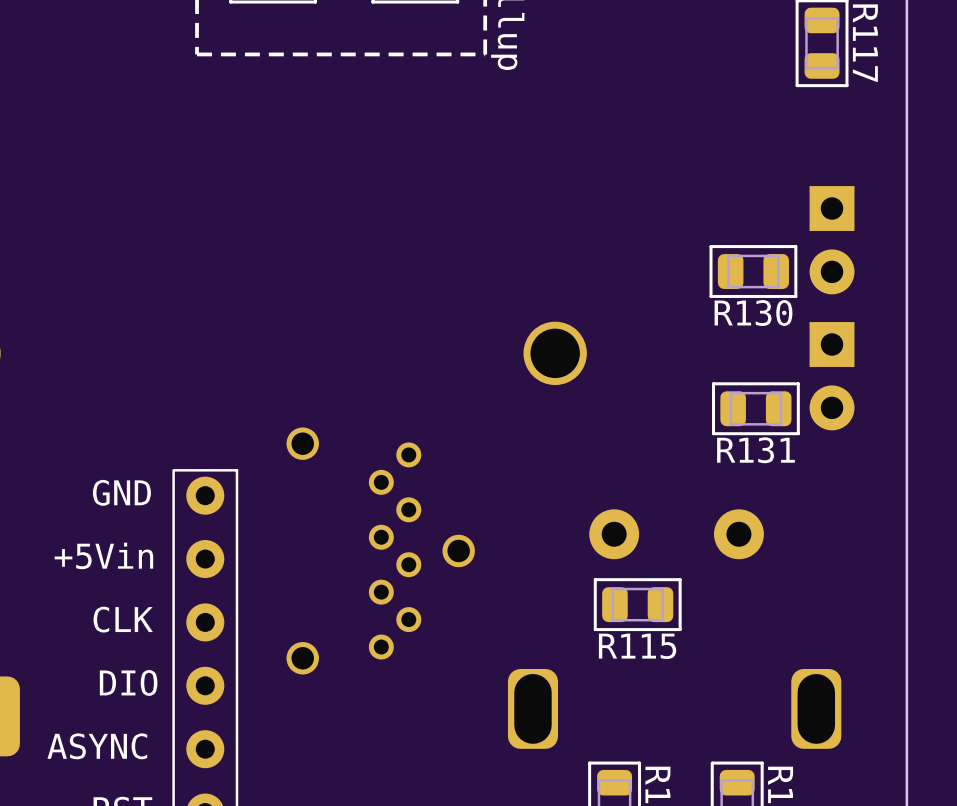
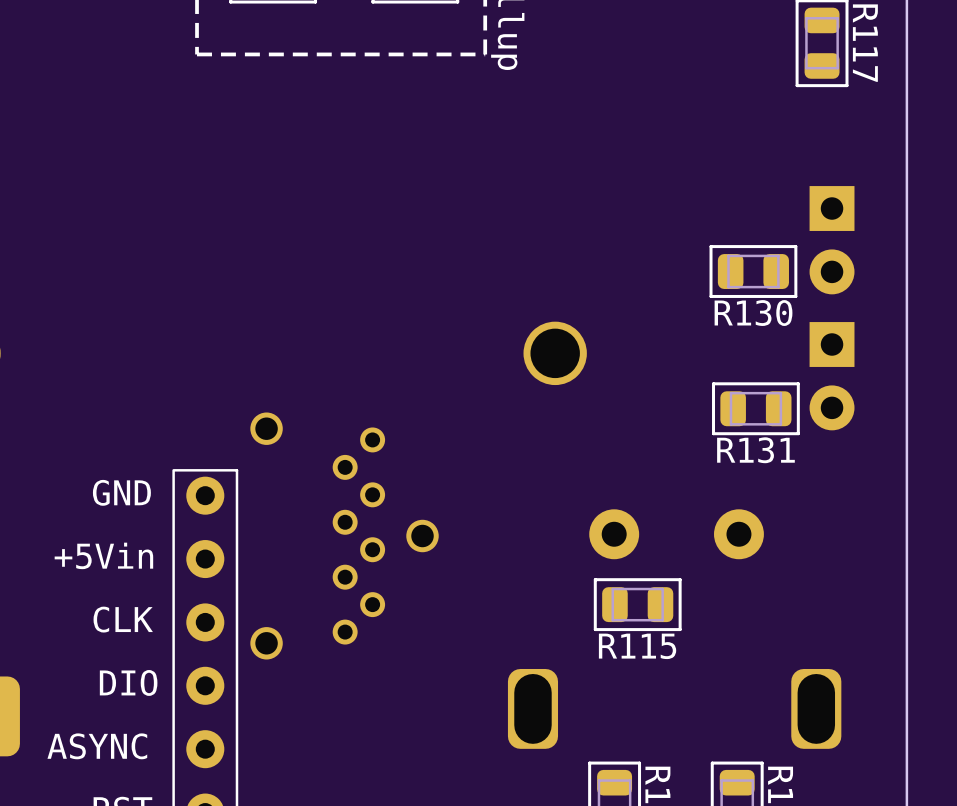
part position: (380, 550) -> (344, 536)

